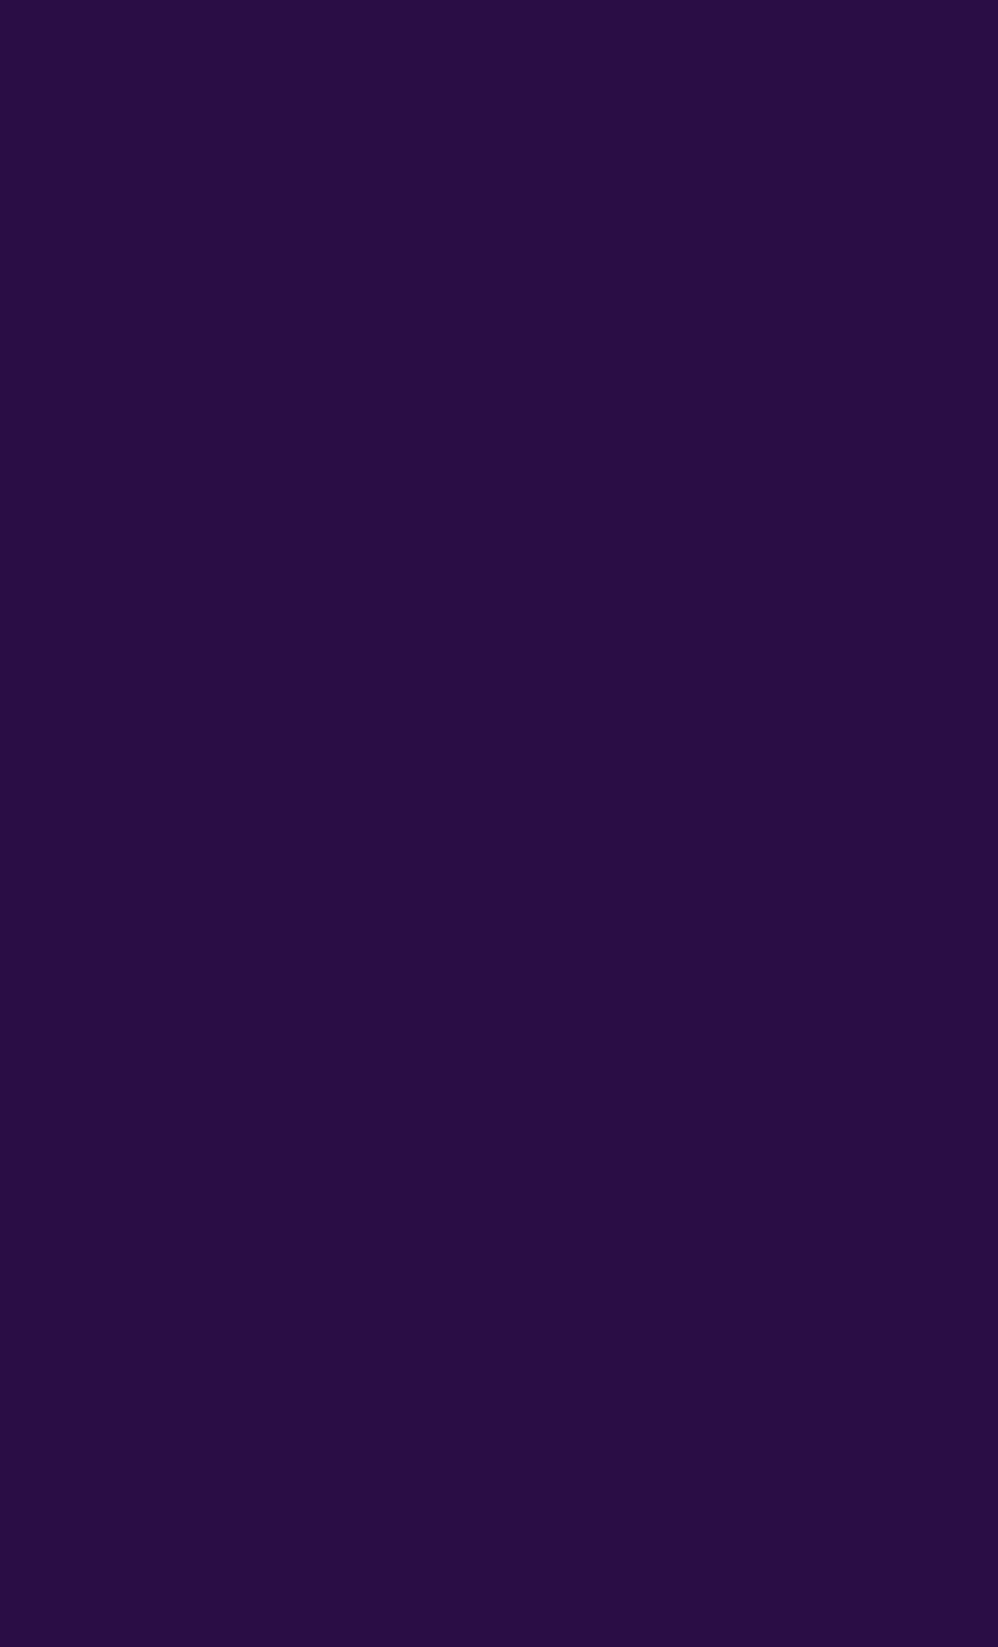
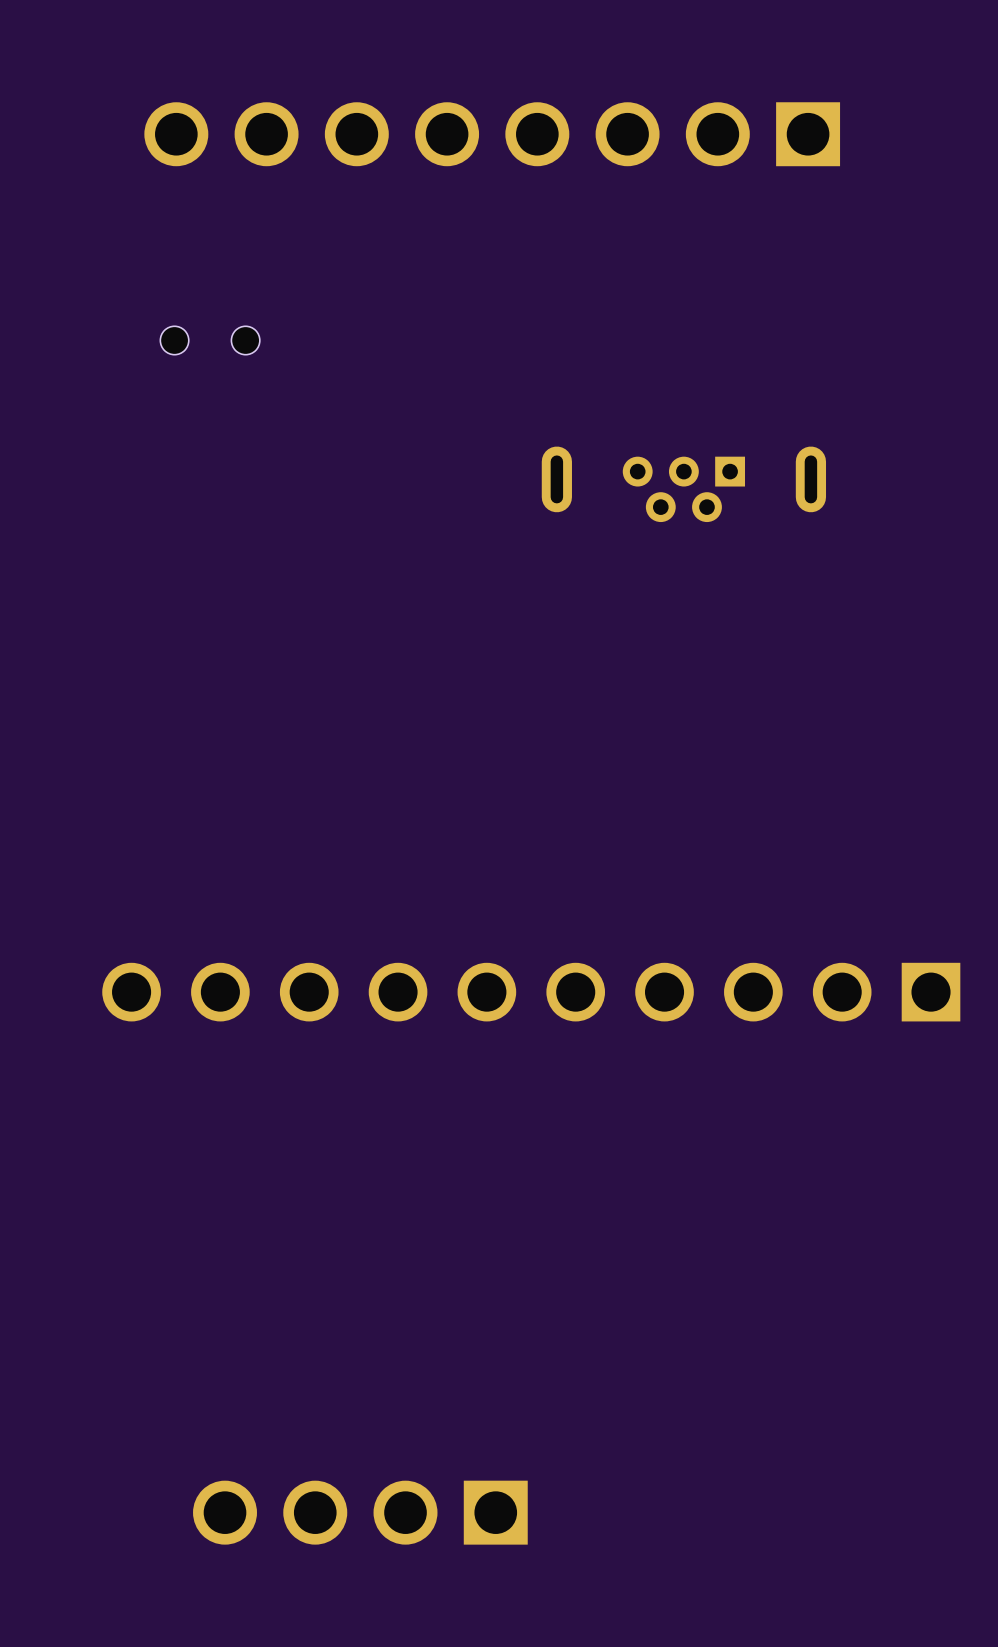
part: none -> (492, 134)
part: none -> (210, 340)
part: none -> (683, 484)
part: none -> (531, 992)
part: none -> (360, 1512)

